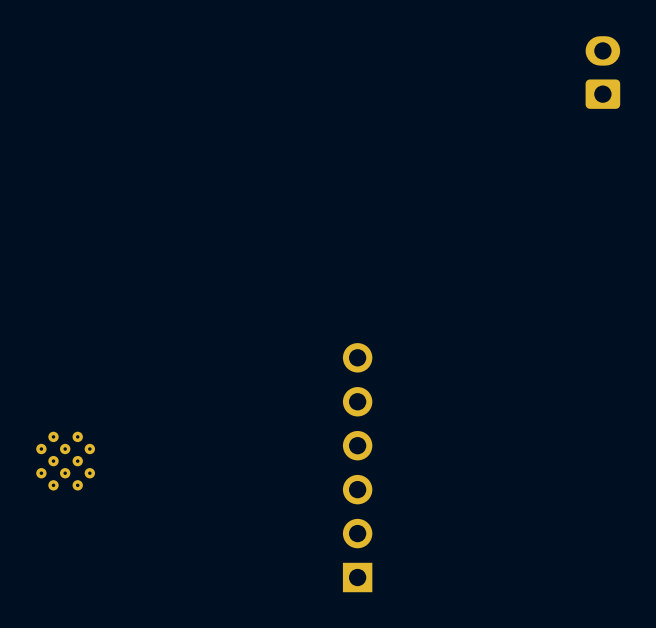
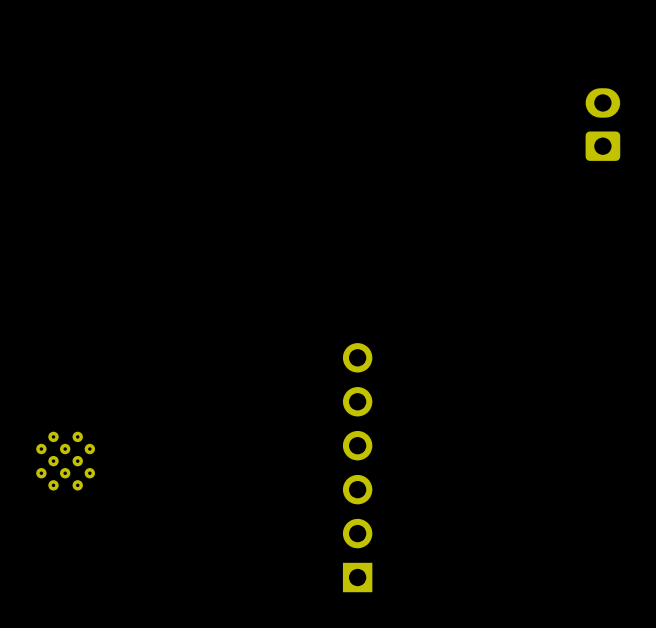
part position: (602, 72) -> (602, 124)

